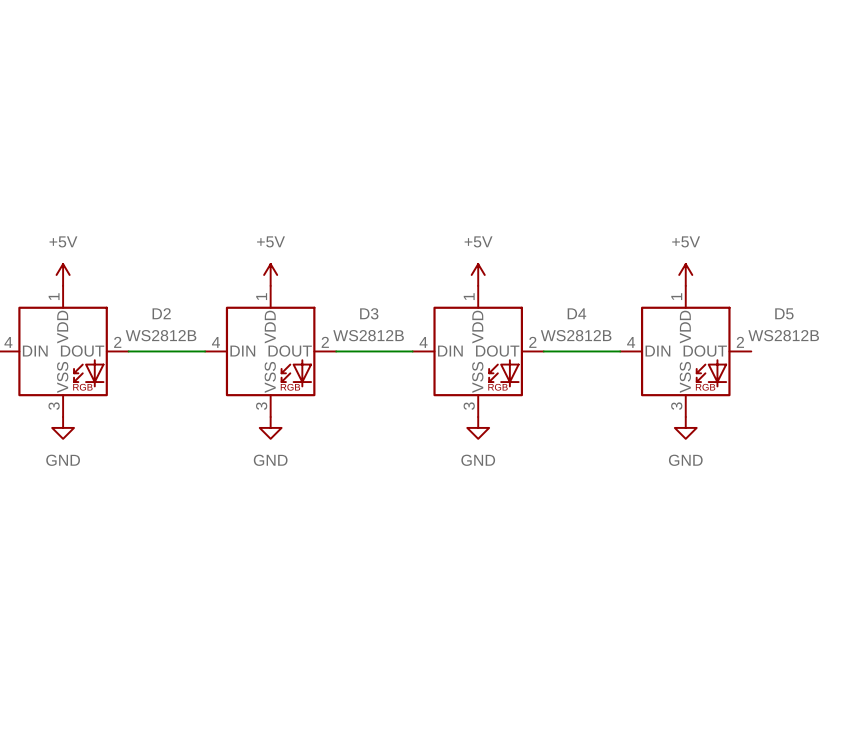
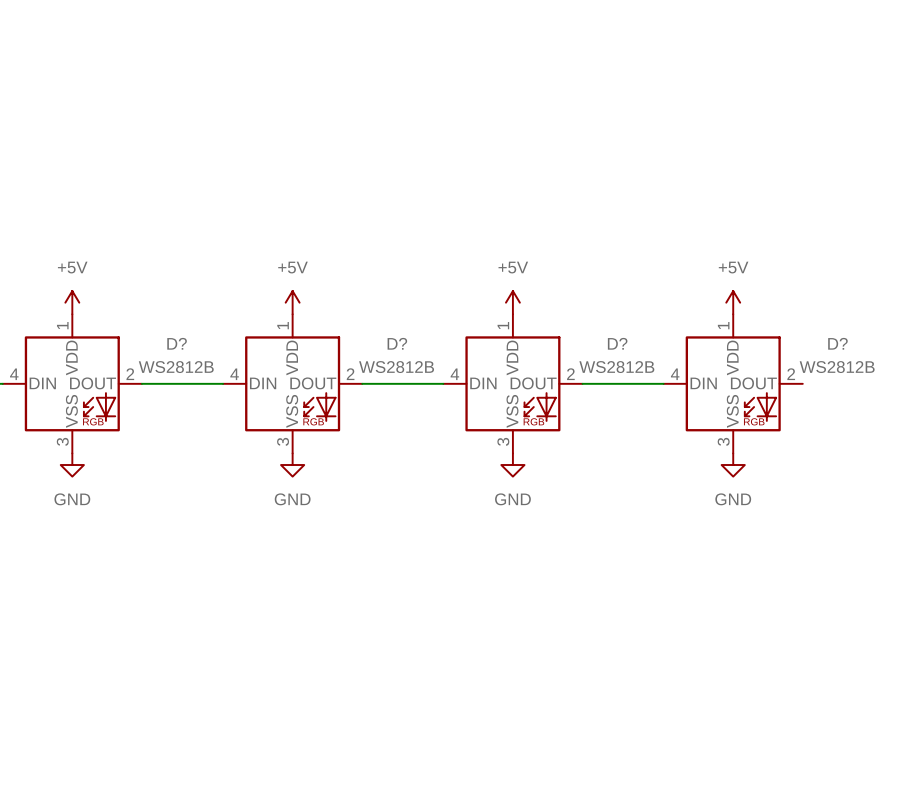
D2 name: D2 (161, 313) -> D? (177, 343)
D3 name: D3 (369, 313) -> D? (397, 343)
D4 name: D4 (576, 313) -> D? (617, 343)
D5 name: D5 (784, 313) -> D? (837, 343)

